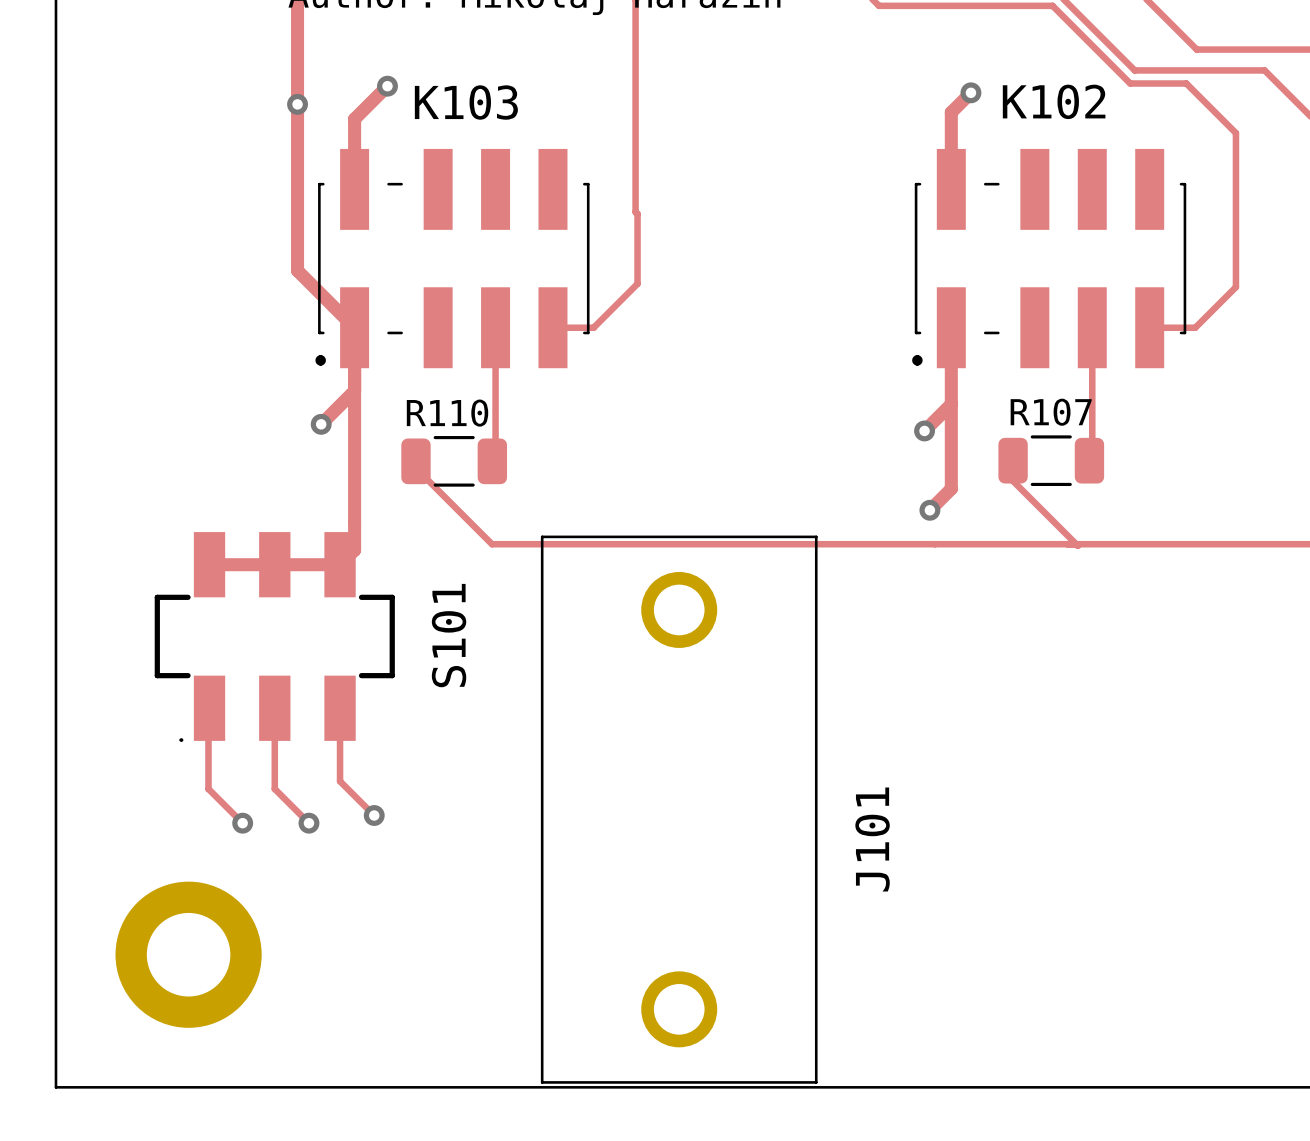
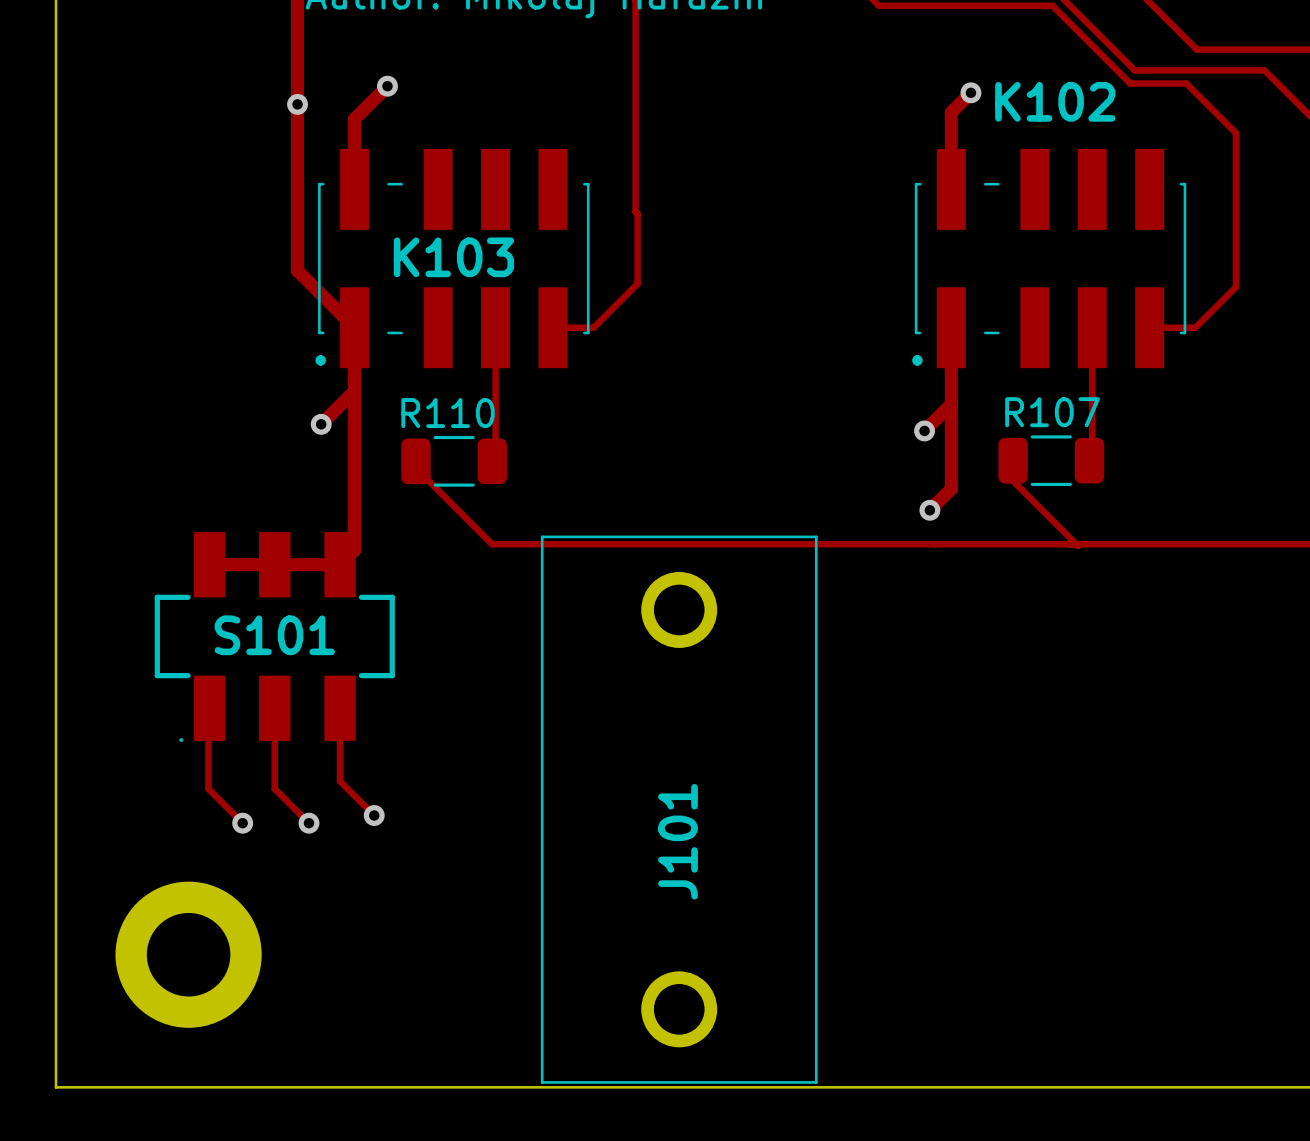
K103 name position: K103 (466, 102) -> K103 (453, 257)
S101 name rotation: 0° (449, 635) -> 90° clockwise (274, 635)
S101 name position: S101 (449, 635) -> S101 (274, 635)
J101 name position: J101 (872, 839) -> J101 (677, 841)

